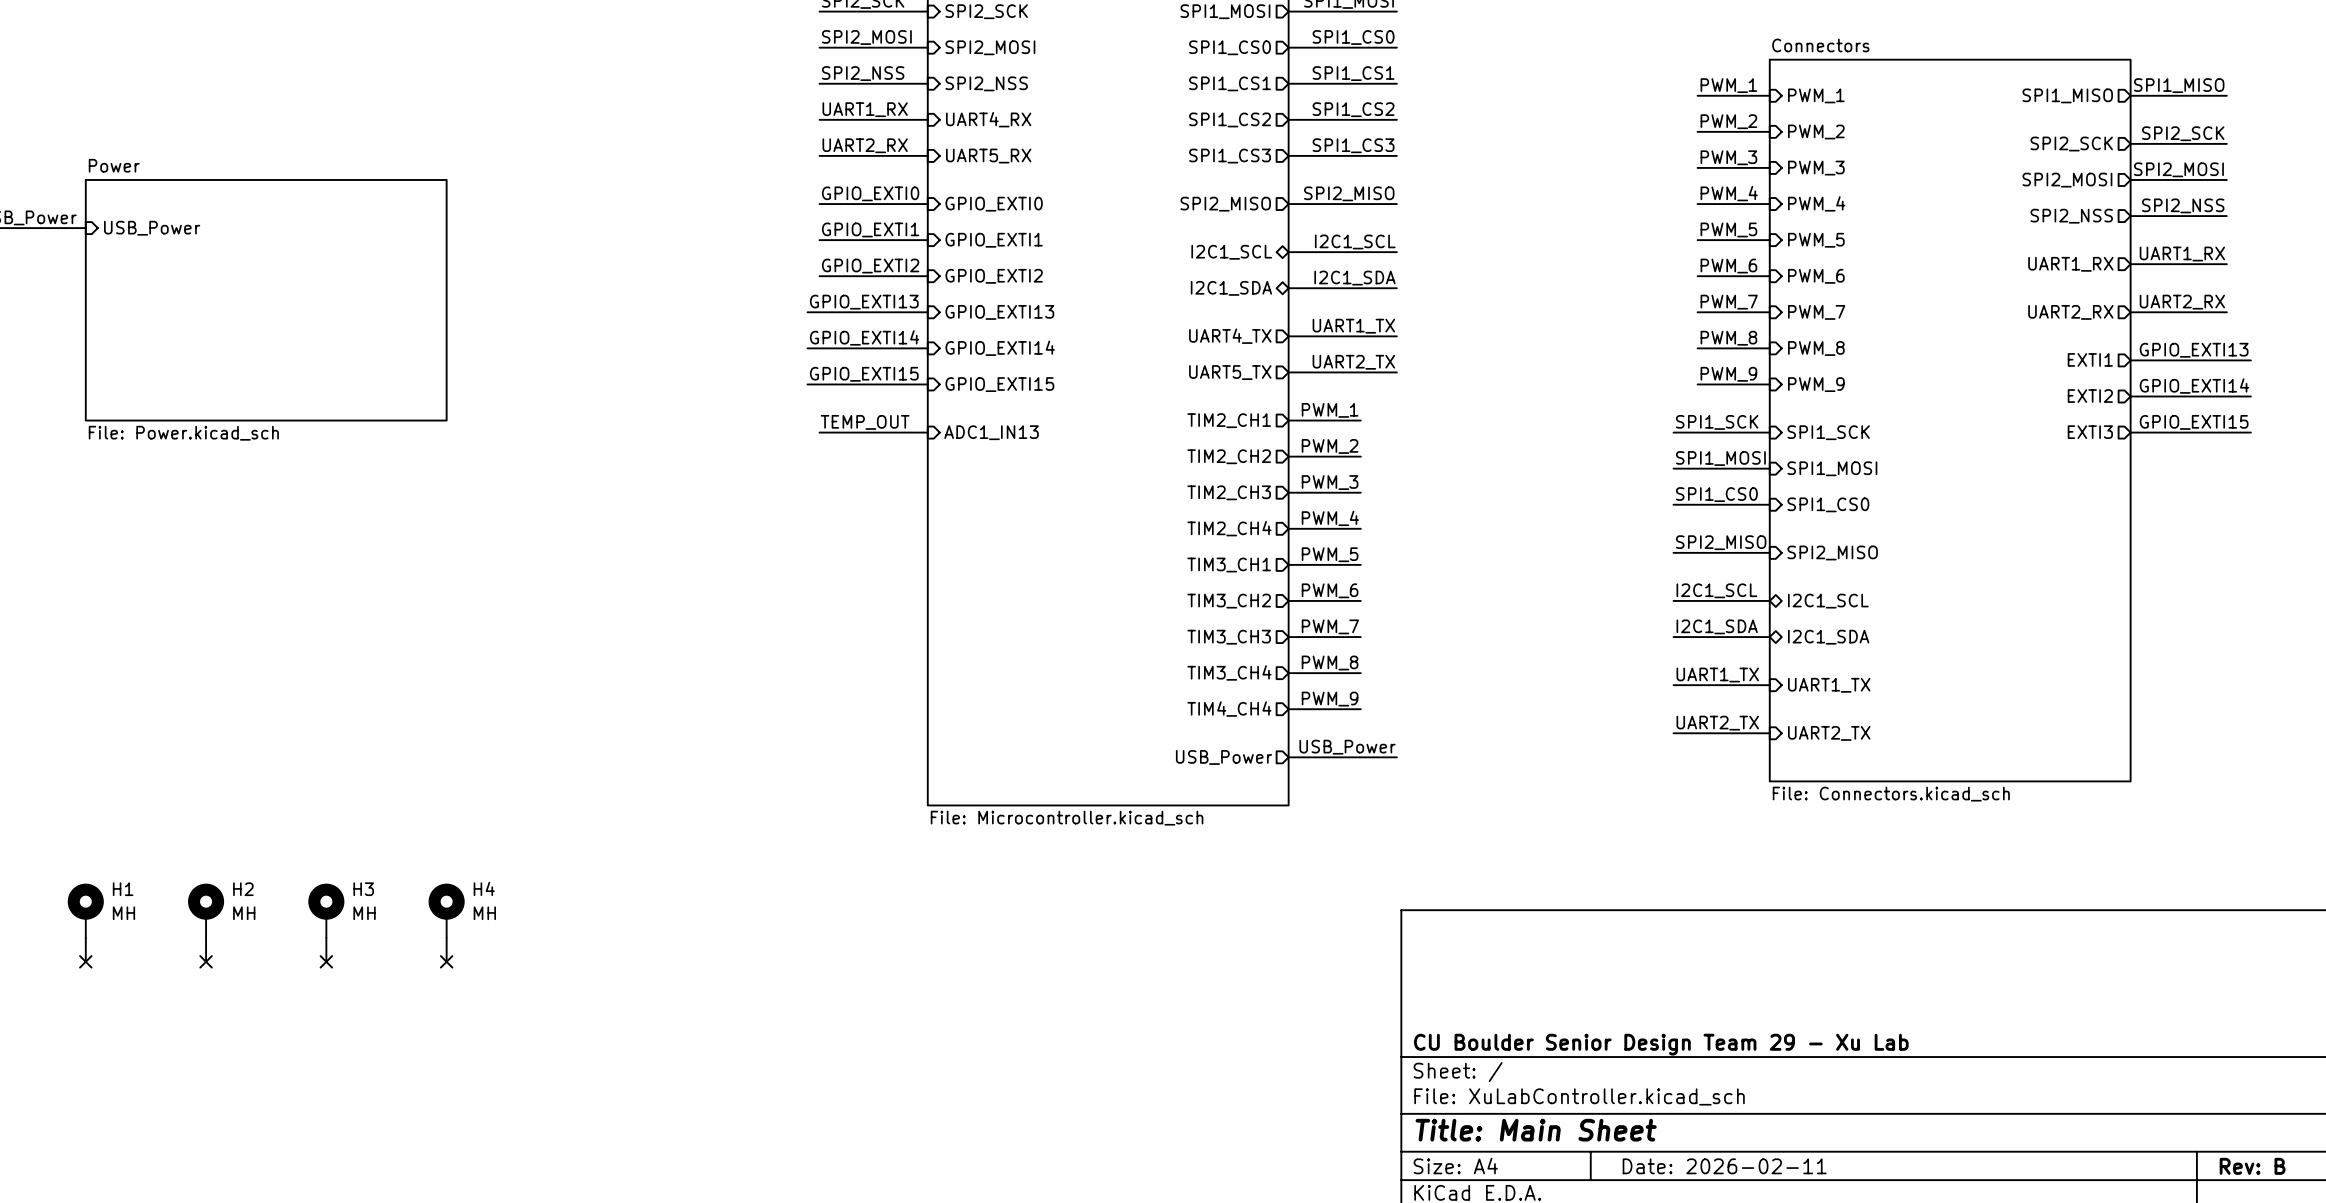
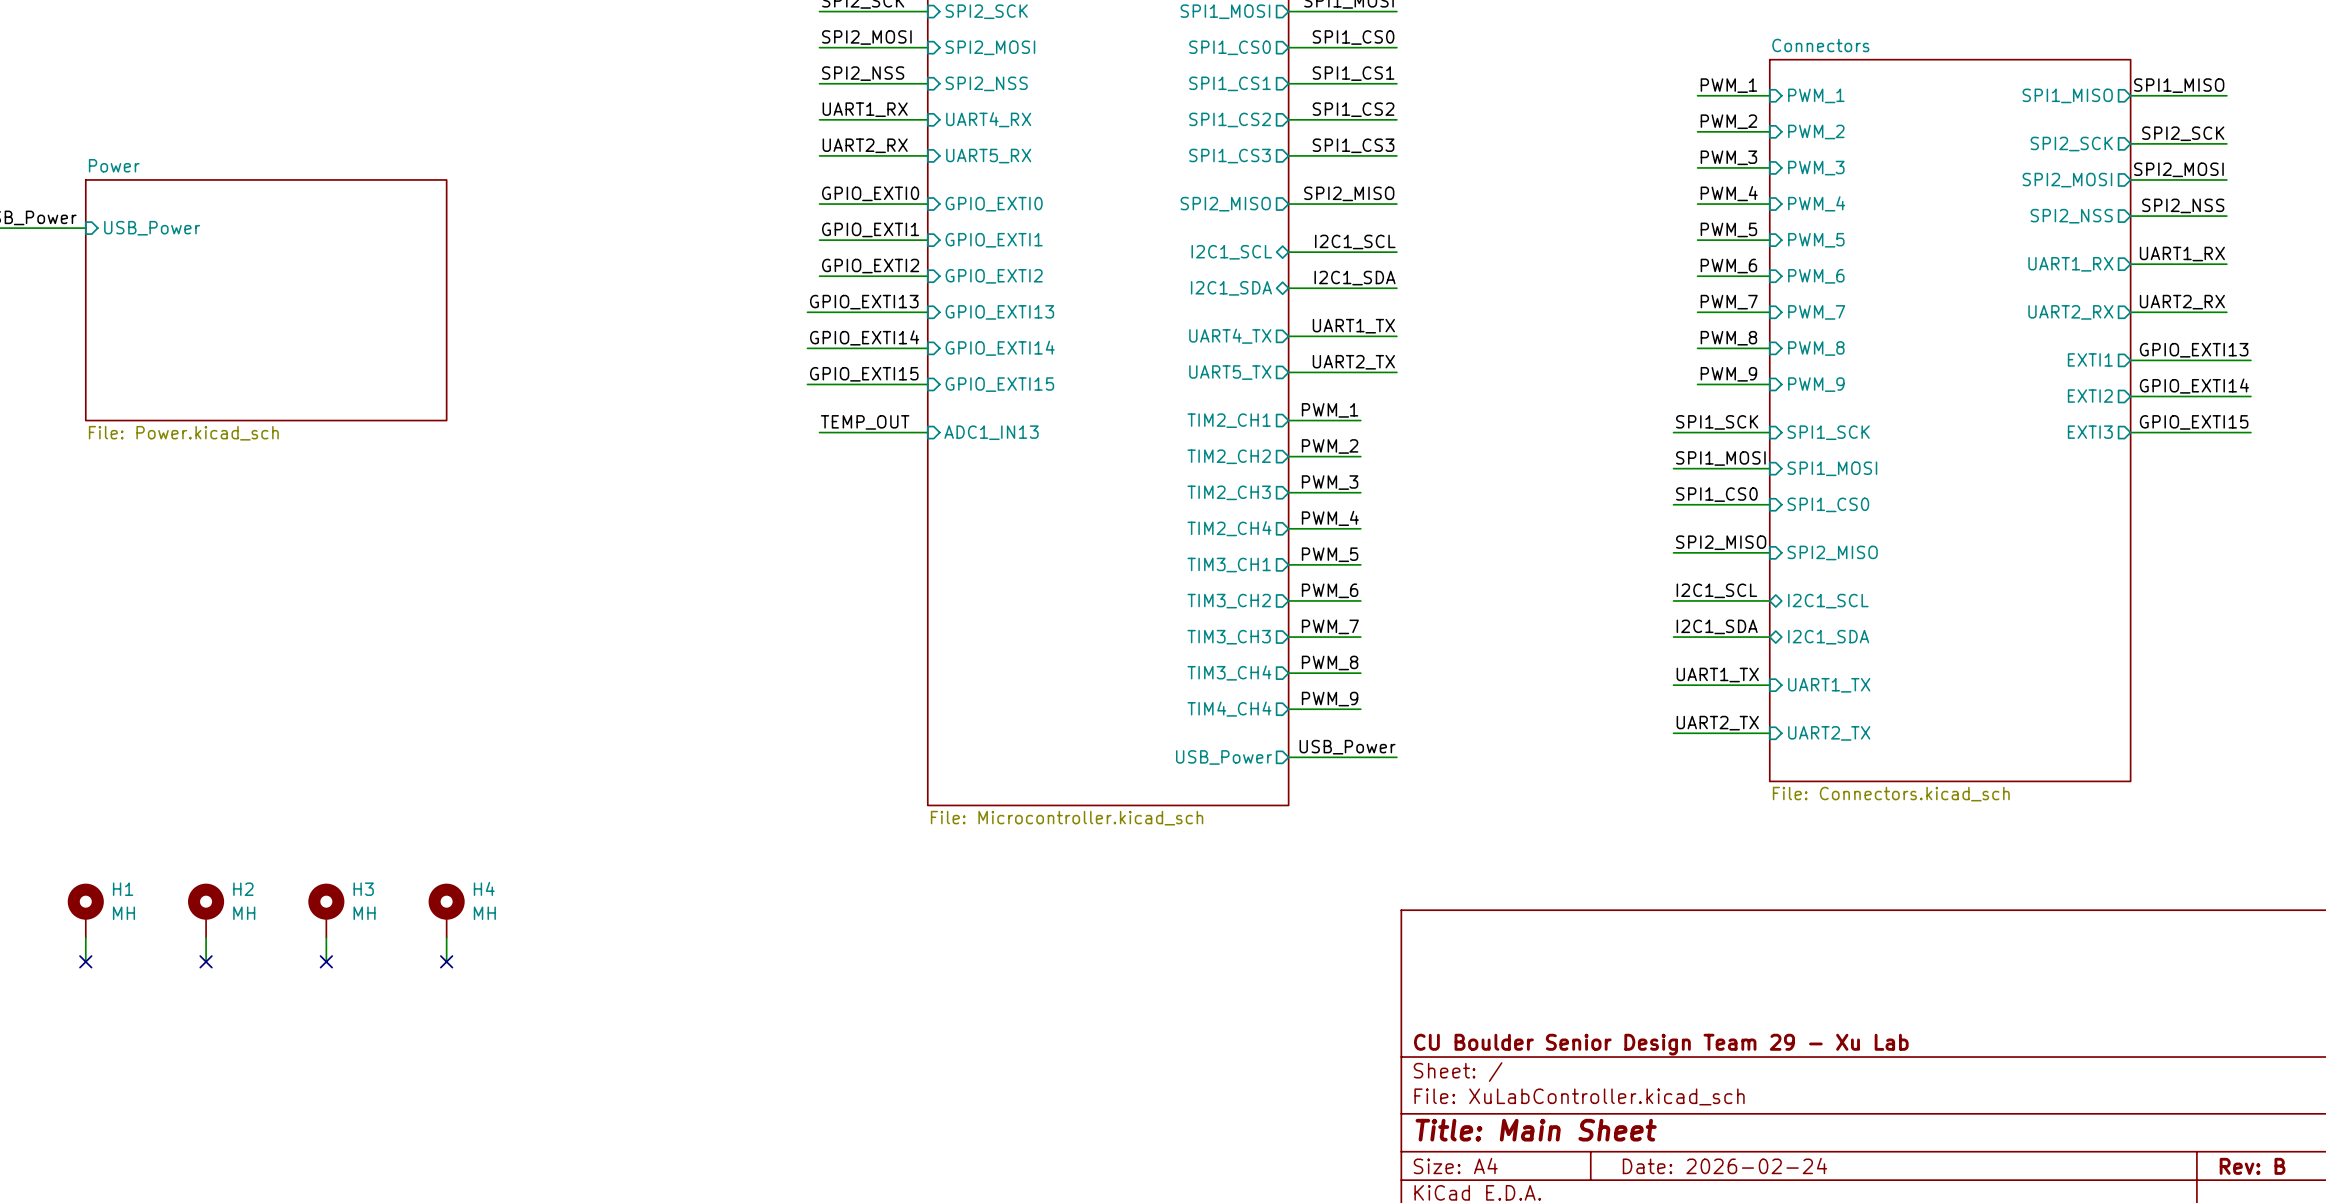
title block: Date: 2026-02-11 (1724, 1166) -> Date: 2026-02-24 (1724, 1166)

